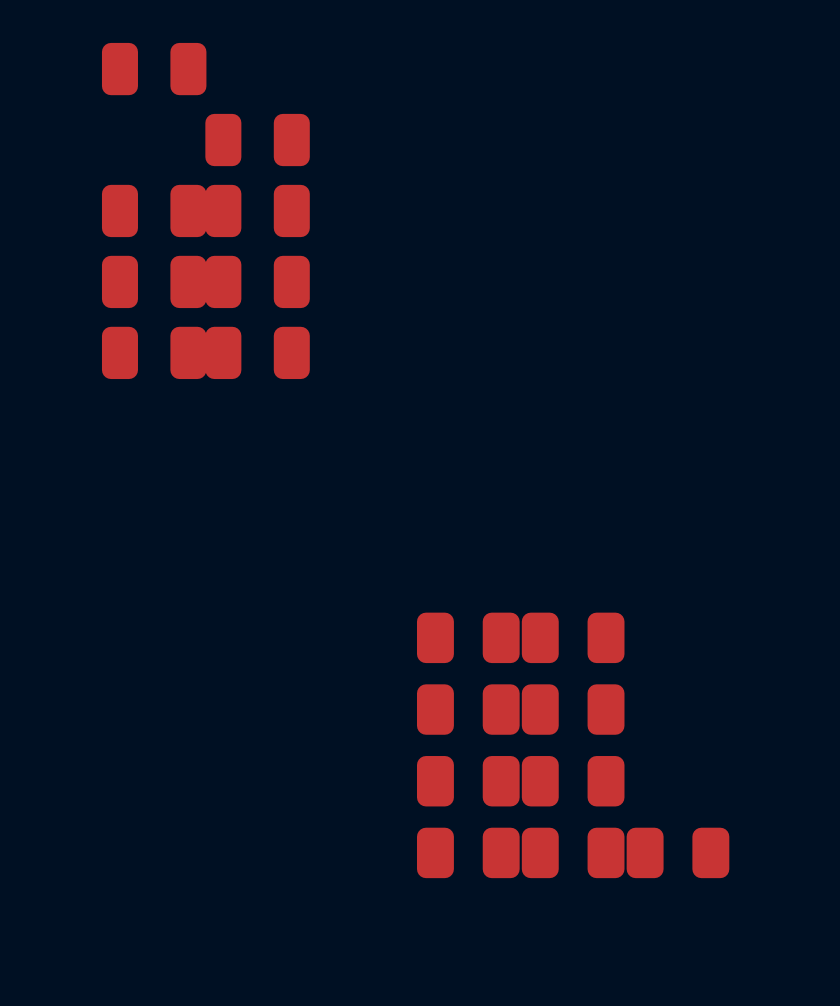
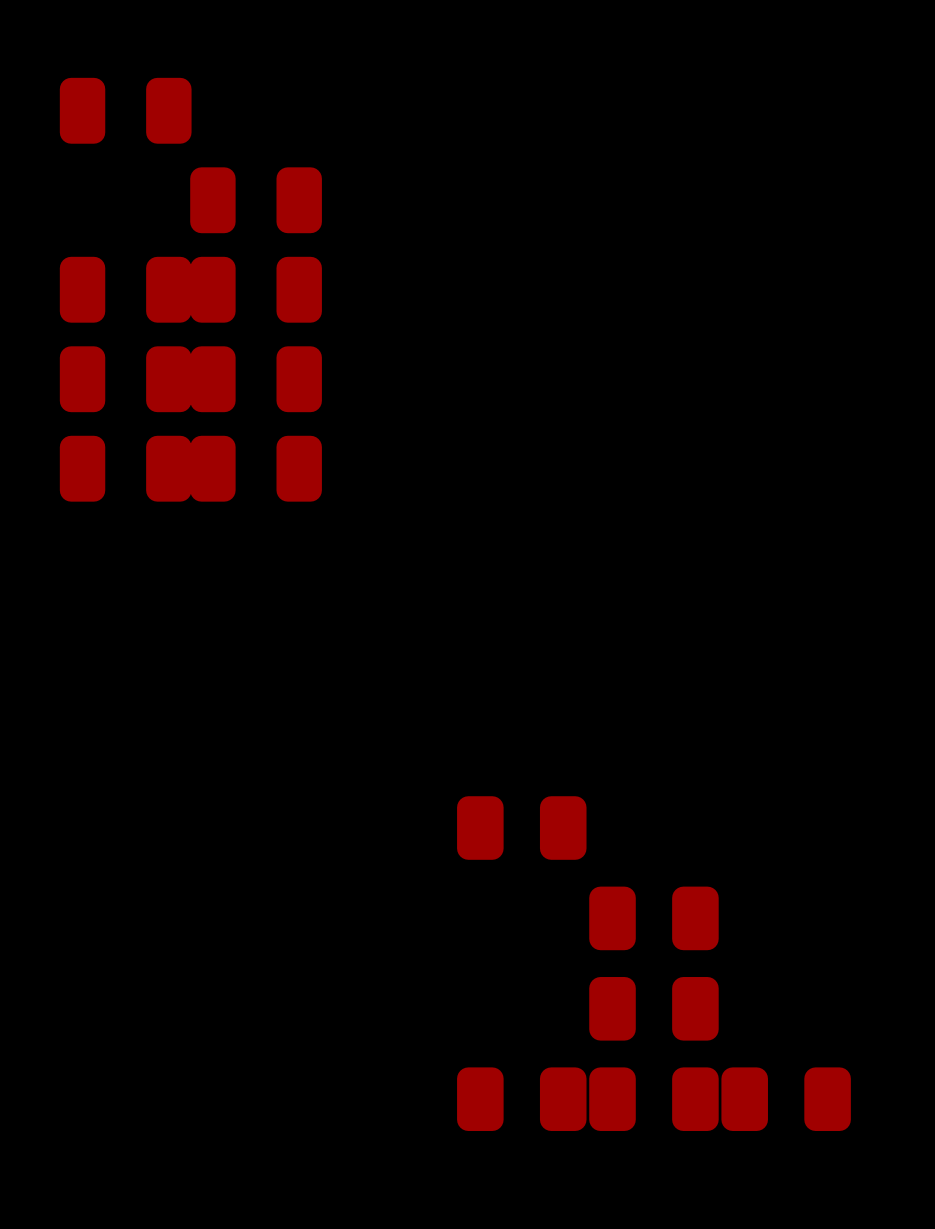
part: (573, 637) -> none
part: (468, 709) -> none
part: (468, 781) -> none

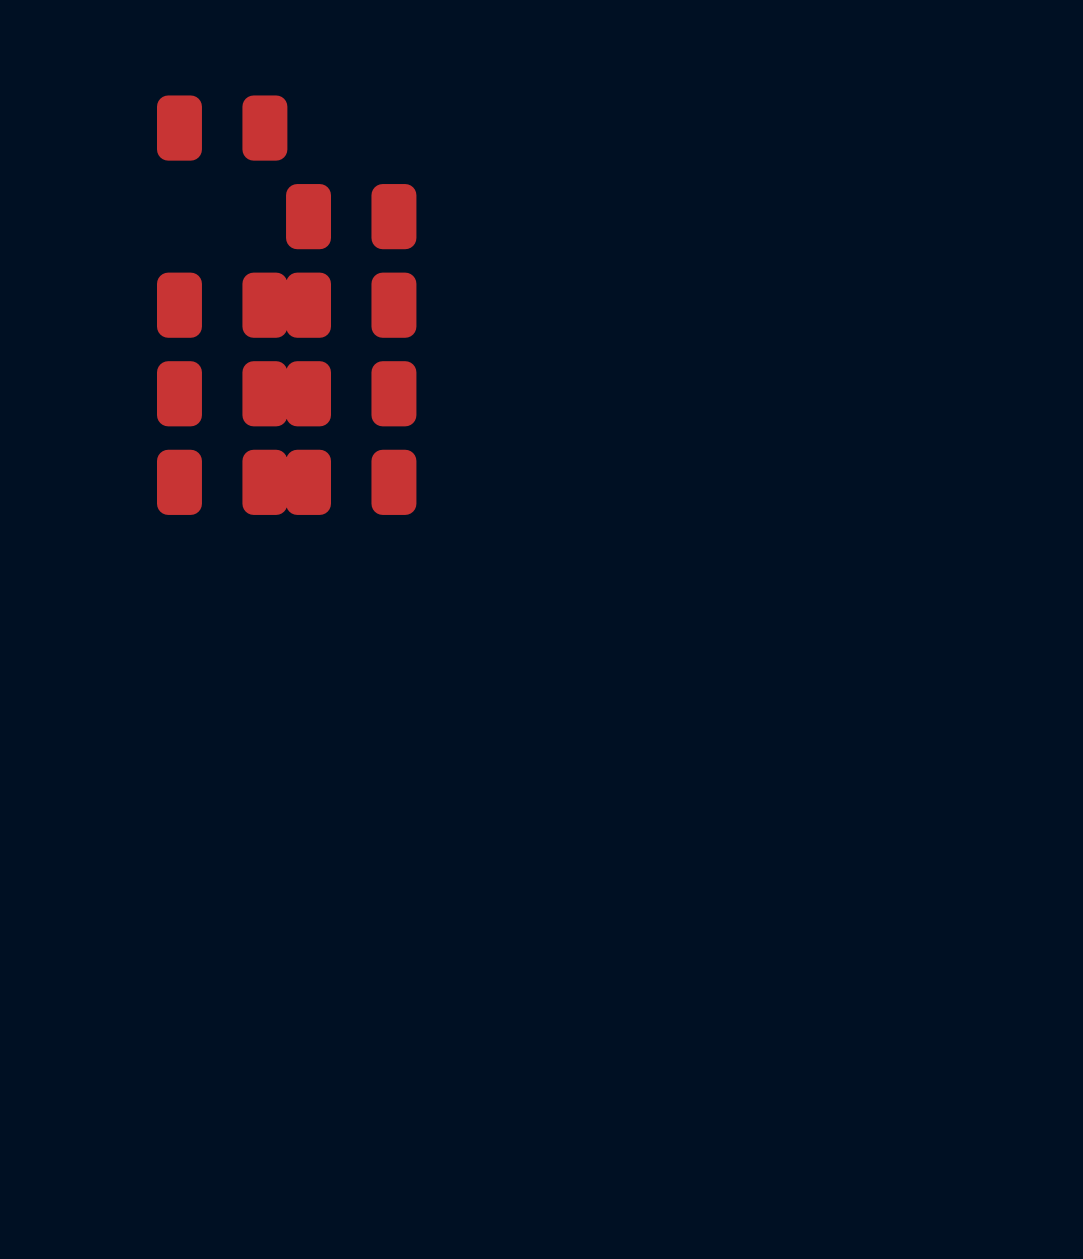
part: (521, 828) -> none
part: (653, 918) -> none
part: (653, 1008) -> none
part: (521, 1099) -> none
part: (653, 1099) -> none
part: (786, 1099) -> none

